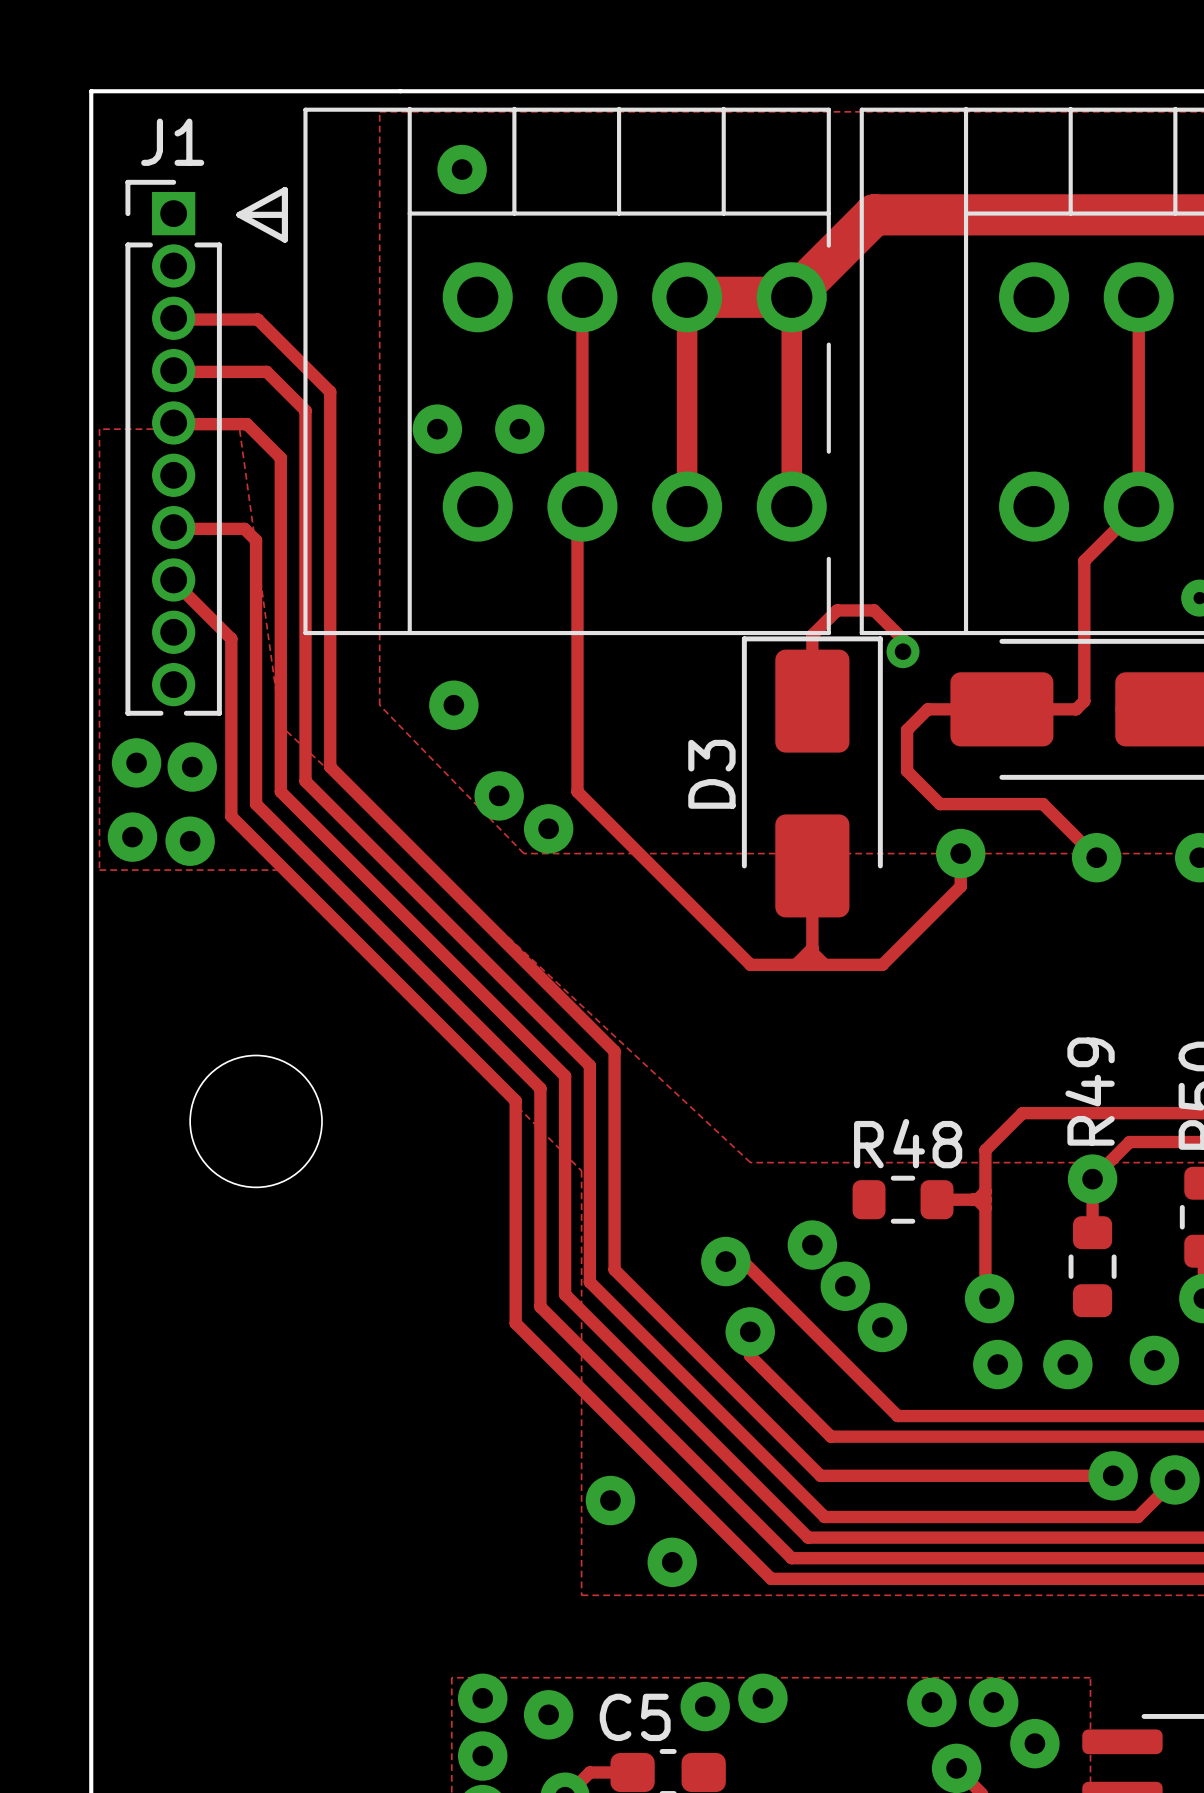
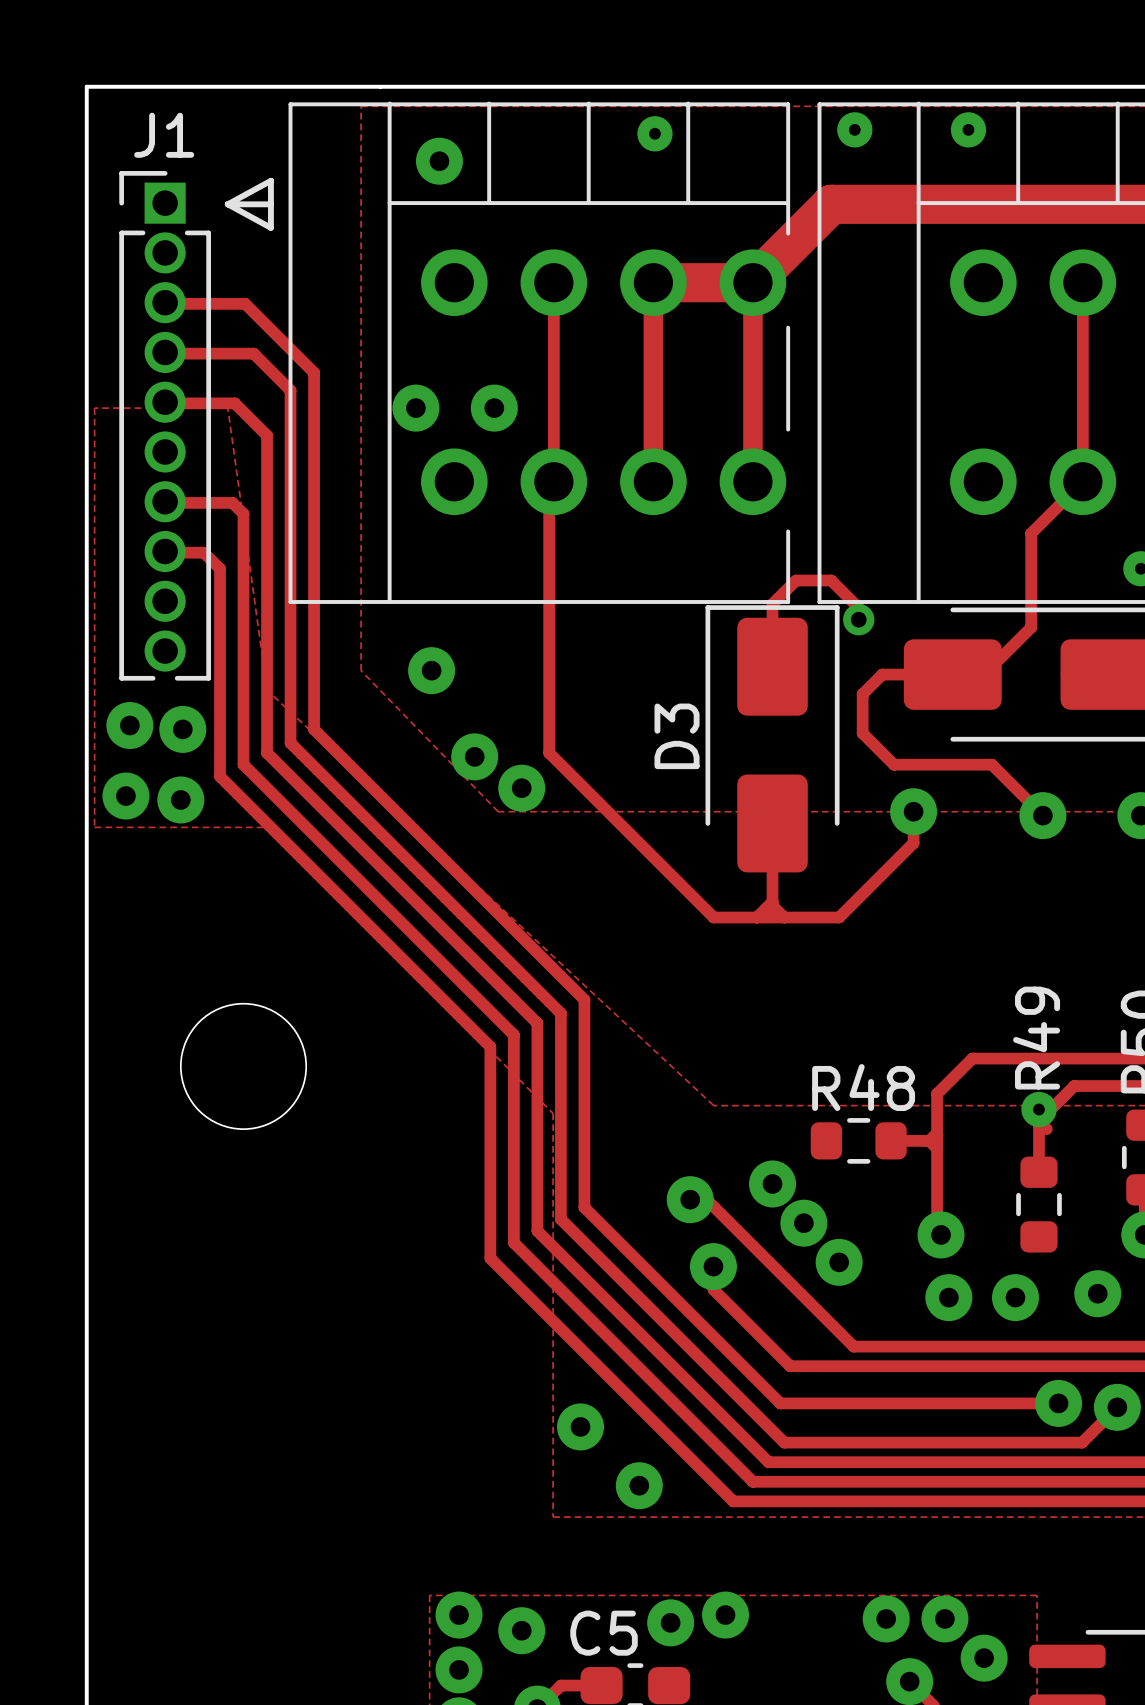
via: none -> (854, 129)
via: none -> (968, 129)
via: none -> (654, 133)
track: (173, 581) (231, 638) -> (165, 552) (203, 552) (220, 568) (220, 607)
track: (1084, 659) (1084, 701) (1076, 709) (1034, 709) -> (1031, 627) (984, 674)
via size: [1067, 1154, 1118, 1204] -> [1021, 1091, 1057, 1128]

